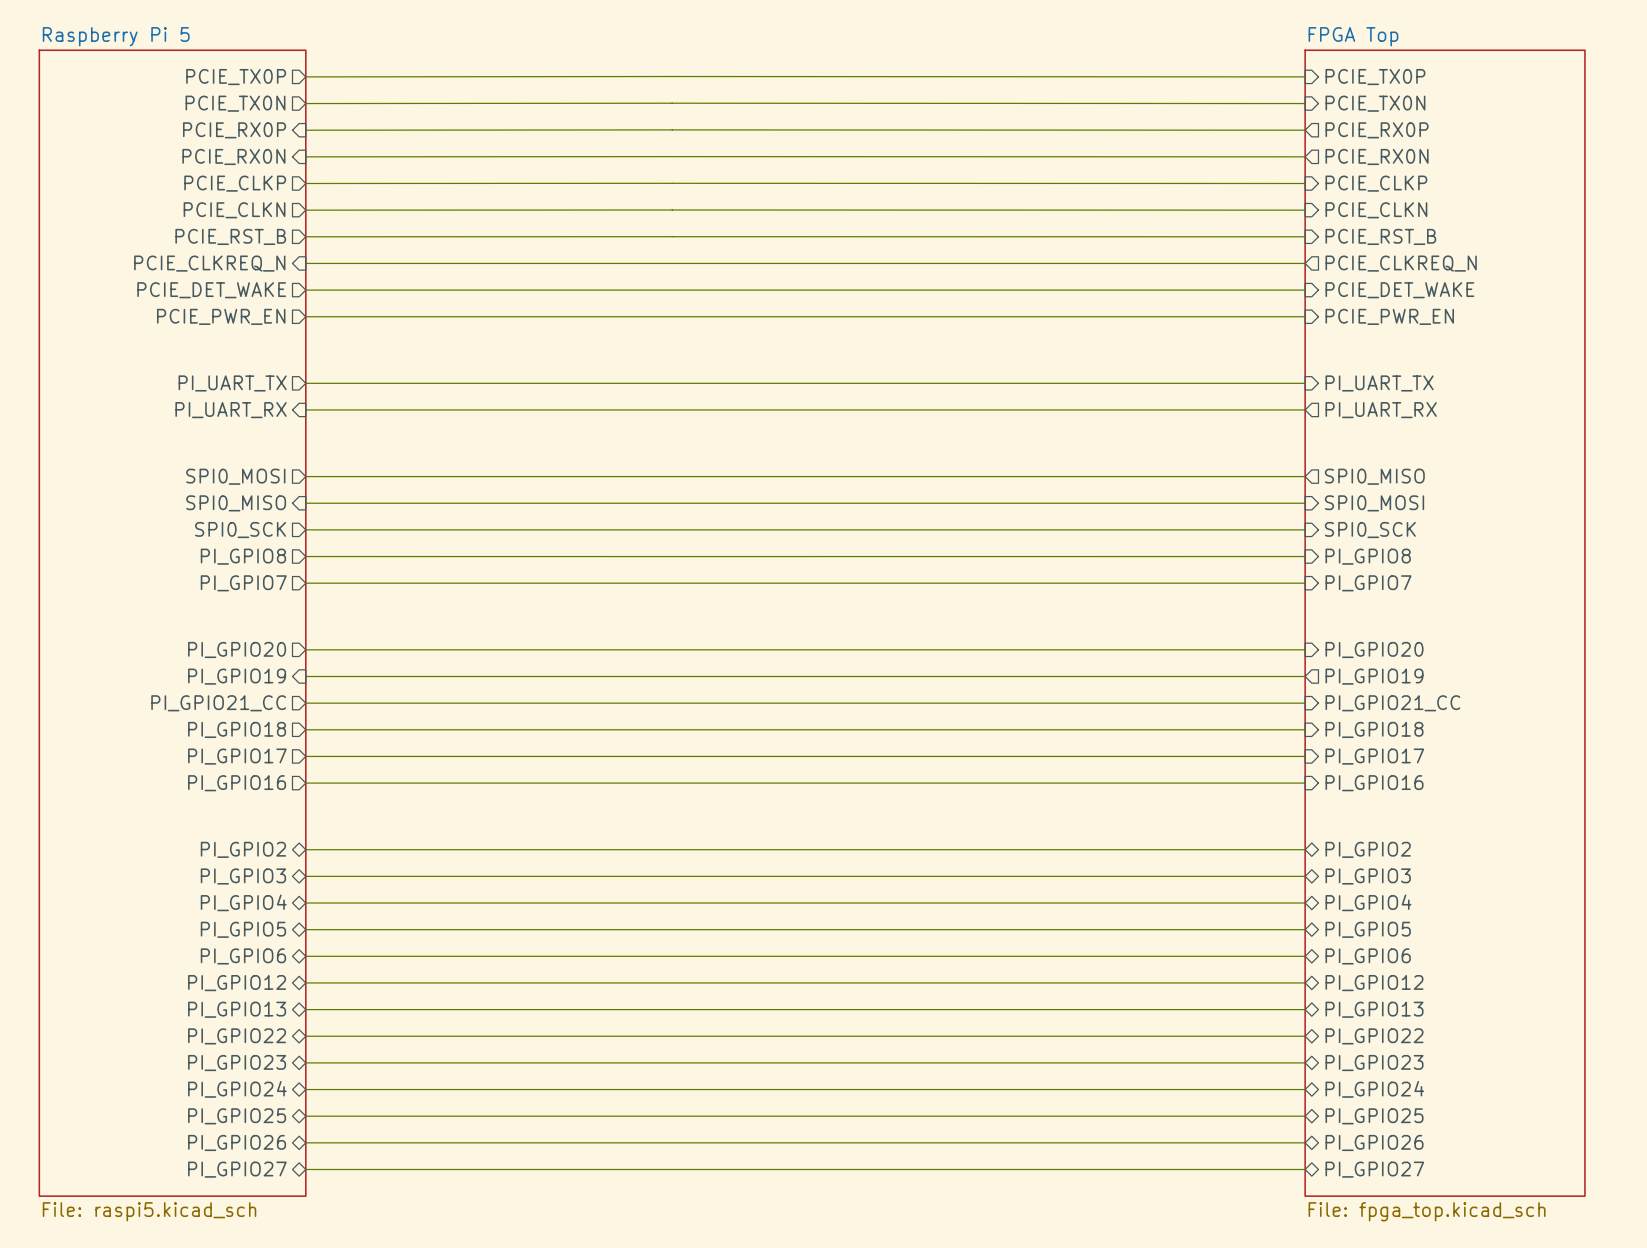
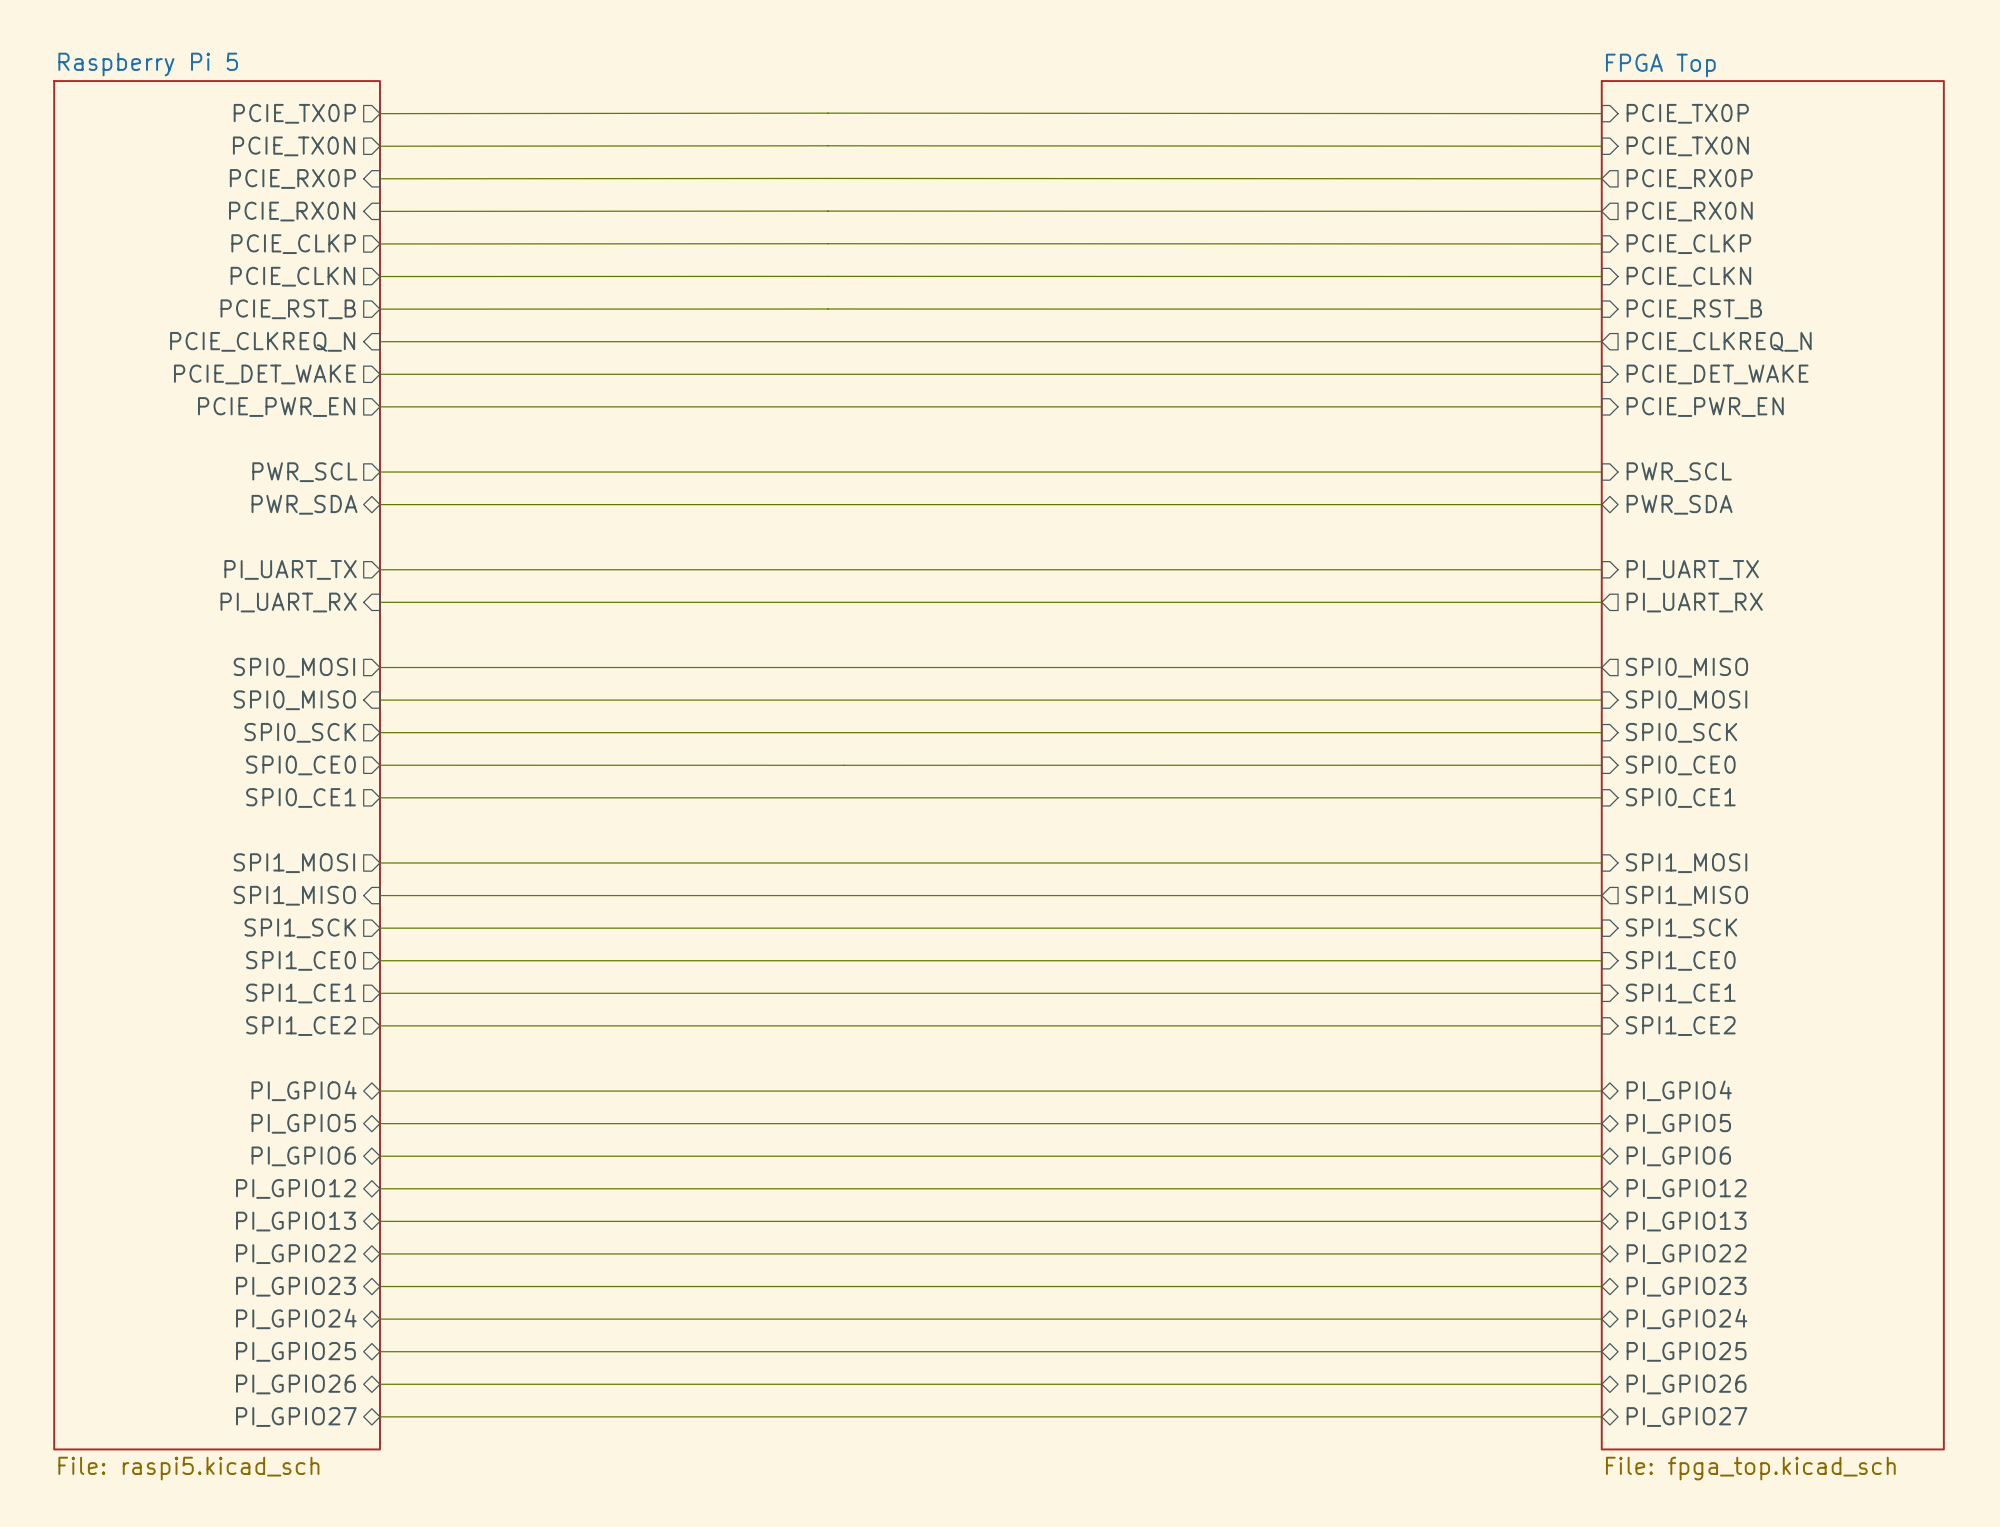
sheet Raspberry Pi 5 shape: [38, 49, 307, 1197] -> [53, 80, 381, 1451]
sheet FPGA Top shape: [1304, 49, 1586, 1197] -> [1600, 80, 1945, 1451]
wire: (305, 76) (1305, 76) -> (379, 113) (1601, 113)
sheet pin position: PCIE_TX0P (236, 77) -> PCIE_TX0P (294, 113)
sheet pin position: PCIE_TX0P (1375, 77) -> PCIE_TX0P (1687, 113)
sheet pin position: PCIE_TX0N (235, 103) -> PCIE_TX0N (294, 146)
wire: (305, 103) (1305, 103) -> (379, 146) (1601, 146)
sheet pin position: PCIE_TX0N (1375, 103) -> PCIE_TX0N (1687, 146)
sheet pin position: PCIE_RX0P (234, 130) -> PCIE_RX0P (292, 178)
wire: (305, 130) (1305, 130) -> (379, 178) (1601, 178)
sheet pin position: PCIE_RX0P (1377, 130) -> PCIE_RX0P (1689, 178)
sheet pin position: PCIE_RX0N (233, 156) -> PCIE_RX0N (292, 211)
wire: (305, 156) (1305, 156) -> (379, 211) (1601, 211)
sheet pin position: PCIE_RX0N (1377, 156) -> PCIE_RX0N (1689, 211)
sheet pin position: PCIE_CLKP (235, 183) -> PCIE_CLKP (293, 244)
wire: (305, 183) (1305, 183) -> (379, 243) (1601, 243)
sheet pin position: PCIE_CLKP (1376, 183) -> PCIE_CLKP (1688, 244)
sheet pin position: PCIE_CLKN (234, 210) -> PCIE_CLKN (292, 276)
wire: (305, 210) (1305, 210) -> (379, 276) (1601, 276)
sheet pin position: PCIE_CLKN (1376, 210) -> PCIE_CLKN (1688, 276)
sheet pin position: PCIE_RST_B (230, 236) -> PCIE_RST_B (288, 309)
wire: (305, 236) (1305, 236) -> (379, 309) (1601, 309)
sheet pin position: PCIE_RST_B (1380, 236) -> PCIE_RST_B (1694, 309)
sheet pin position: PCIE_CLKREQ_N (209, 263) -> PCIE_CLKREQ_N (262, 341)
wire: (305, 263) (1305, 263) -> (379, 341) (1601, 341)
sheet pin position: PCIE_CLKREQ_N (1401, 263) -> PCIE_CLKREQ_N (1719, 341)
sheet pin position: PCIE_DET_WAKE (211, 290) -> PCIE_DET_WAKE (264, 374)
wire: (305, 290) (1305, 290) -> (379, 374) (1601, 374)
sheet pin position: PCIE_DET_WAKE (1399, 290) -> PCIE_DET_WAKE (1717, 374)
sheet pin position: PCIE_PWR_EN (221, 316) -> PCIE_PWR_EN (276, 407)
wire: (305, 316) (1305, 316) -> (379, 406) (1601, 406)
sheet pin position: PCIE_PWR_EN (1389, 316) -> PCIE_PWR_EN (1705, 407)
sheet pin: PI_UART_TX (232, 383) -> PWR_SCL (304, 472)
sheet pin: PI_UART_TX (1379, 383) -> PWR_SCL (1679, 472)
sheet pin shape: input (231, 410) -> bidirectional (304, 504)
sheet pin: PI_UART_RX (231, 410) -> PWR_SDA (304, 504)
sheet pin shape: output (1381, 410) -> bidirectional (1679, 504)
sheet pin: PI_UART_RX (1381, 410) -> PWR_SDA (1679, 504)
sheet pin: none -> PI_UART_TX (290, 569)
wire: none -> (379, 569) (1601, 569)
sheet pin: none -> PI_UART_TX (1692, 569)
sheet pin position: SPI0_MOSI (235, 476) -> SPI0_MOSI (294, 667)
wire: (305, 476) (1305, 476) -> (379, 667) (1601, 667)
sheet pin position: SPI0_MISO (1374, 476) -> SPI0_MISO (1686, 667)
sheet pin: none -> PI_UART_RX (288, 602)
sheet pin: none -> PI_UART_RX (1694, 602)
sheet pin position: SPI0_MISO (236, 503) -> SPI0_MISO (294, 700)
wire: (305, 503) (1305, 503) -> (379, 700) (1601, 700)
sheet pin position: SPI0_MOSI (1374, 503) -> SPI0_MOSI (1686, 700)
wire: (305, 529) (1305, 529) -> (379, 732) (1601, 732)
sheet pin position: SPI0_SCK (240, 530) -> SPI0_SCK (300, 732)
sheet pin position: SPI0_SCK (1370, 530) -> SPI0_SCK (1681, 732)
sheet pin: PI_GPIO8 (243, 556) -> none
wire: (305, 556) (1305, 556) -> (379, 765) (1601, 765)
sheet pin: PI_GPIO8 (1368, 556) -> none
sheet pin: PI_GPIO7 (243, 583) -> none
wire: (305, 583) (1305, 583) -> (379, 602) (1601, 602)
sheet pin: PI_GPIO7 (1368, 583) -> none
sheet pin: none -> SPI0_CE0 (301, 765)
sheet pin: none -> SPI0_CE0 (1680, 765)
sheet pin: PI_GPIO20 (237, 649) -> SPI0_CE1 (301, 797)
sheet pin: PI_GPIO20 (1374, 649) -> SPI0_CE1 (1680, 797)
sheet pin: PI_GPIO19 (237, 676) -> none
wire: (305, 676) (1305, 676) -> (379, 993) (1601, 993)
sheet pin: PI_GPIO19 (1374, 676) -> none
sheet pin: PI_GPIO21_CC (218, 703) -> SPI1_MOSI (294, 863)
sheet pin: PI_GPIO21_CC (1392, 703) -> SPI1_MOSI (1686, 863)
sheet pin shape: output (237, 729) -> input (294, 895)
sheet pin: PI_GPIO18 (237, 729) -> SPI1_MISO (294, 895)
sheet pin shape: input (1374, 729) -> output (1686, 895)
sheet pin: PI_GPIO18 (1374, 729) -> SPI1_MISO (1686, 895)
sheet pin: PI_GPIO17 (237, 756) -> SPI1_SCK (300, 928)
sheet pin: PI_GPIO17 (1374, 756) -> SPI1_SCK (1681, 928)
sheet pin: PI_GPIO16 (237, 783) -> SPI1_CE0 (301, 960)
sheet pin: PI_GPIO16 (1374, 783) -> SPI1_CE0 (1680, 960)
sheet pin: none -> SPI1_CE1 (301, 993)
sheet pin: none -> SPI1_CE1 (1680, 993)
sheet pin: none -> SPI1_CE2 (301, 1026)
sheet pin: none -> SPI1_CE2 (1680, 1026)
sheet pin: PI_GPIO2 (243, 849) -> none
wire: (305, 849) (1305, 849) -> (379, 1025) (1601, 1025)
sheet pin: PI_GPIO2 (1368, 849) -> none
sheet pin: PI_GPIO3 (243, 876) -> none
wire: (305, 876) (1305, 876) -> (379, 1091) (1601, 1091)
sheet pin: PI_GPIO3 (1368, 876) -> none
sheet pin position: PI_GPIO4 (243, 902) -> PI_GPIO4 (304, 1090)
sheet pin position: PI_GPIO4 (1368, 902) -> PI_GPIO4 (1679, 1090)
wire: (305, 903) (1305, 903) -> (379, 1123) (1601, 1123)
sheet pin position: PI_GPIO5 (243, 929) -> PI_GPIO5 (303, 1123)
wire: (305, 929) (1305, 929) -> (379, 1156) (1601, 1156)
sheet pin position: PI_GPIO5 (1368, 929) -> PI_GPIO5 (1678, 1123)
sheet pin position: PI_GPIO6 (243, 956) -> PI_GPIO6 (303, 1156)
wire: (305, 956) (1305, 956) -> (379, 1188) (1601, 1188)
sheet pin position: PI_GPIO6 (1368, 956) -> PI_GPIO6 (1678, 1156)
wire: (305, 982) (1305, 982) -> (379, 1221) (1601, 1221)
sheet pin position: PI_GPIO12 (237, 983) -> PI_GPIO12 (295, 1188)
sheet pin position: PI_GPIO12 (1374, 983) -> PI_GPIO12 (1686, 1188)
sheet pin position: PI_GPIO13 (237, 1009) -> PI_GPIO13 (295, 1221)
wire: (305, 1009) (1305, 1009) -> (379, 1253) (1601, 1253)
sheet pin position: PI_GPIO13 (1374, 1009) -> PI_GPIO13 (1686, 1221)
sheet pin position: PI_GPIO22 (237, 1036) -> PI_GPIO22 (295, 1254)
wire: (305, 1036) (1305, 1036) -> (379, 1286) (1601, 1286)
sheet pin position: PI_GPIO22 (1374, 1036) -> PI_GPIO22 (1686, 1254)
wire: (305, 1062) (1305, 1062) -> (379, 1319) (1601, 1319)
sheet pin position: PI_GPIO23 (237, 1063) -> PI_GPIO23 (295, 1286)
sheet pin position: PI_GPIO23 (1374, 1063) -> PI_GPIO23 (1686, 1286)
sheet pin position: PI_GPIO24 (237, 1089) -> PI_GPIO24 (296, 1318)
wire: (305, 1089) (1305, 1089) -> (379, 1351) (1601, 1351)
sheet pin position: PI_GPIO24 (1374, 1089) -> PI_GPIO24 (1686, 1318)
sheet pin position: PI_GPIO25 (237, 1116) -> PI_GPIO25 (295, 1351)
wire: (305, 1116) (1305, 1116) -> (379, 1384) (1601, 1384)
sheet pin position: PI_GPIO25 (1374, 1116) -> PI_GPIO25 (1686, 1351)
sheet pin position: PI_GPIO26 (237, 1142) -> PI_GPIO26 (295, 1384)
wire: (305, 1142) (1305, 1142) -> (379, 1416) (1601, 1416)
sheet pin position: PI_GPIO26 (1374, 1142) -> PI_GPIO26 (1686, 1384)
sheet pin position: PI_GPIO27 (237, 1169) -> PI_GPIO27 (296, 1417)
wire: (305, 1169) (1305, 1169) -> none
sheet pin position: PI_GPIO27 (1374, 1169) -> PI_GPIO27 (1686, 1417)

